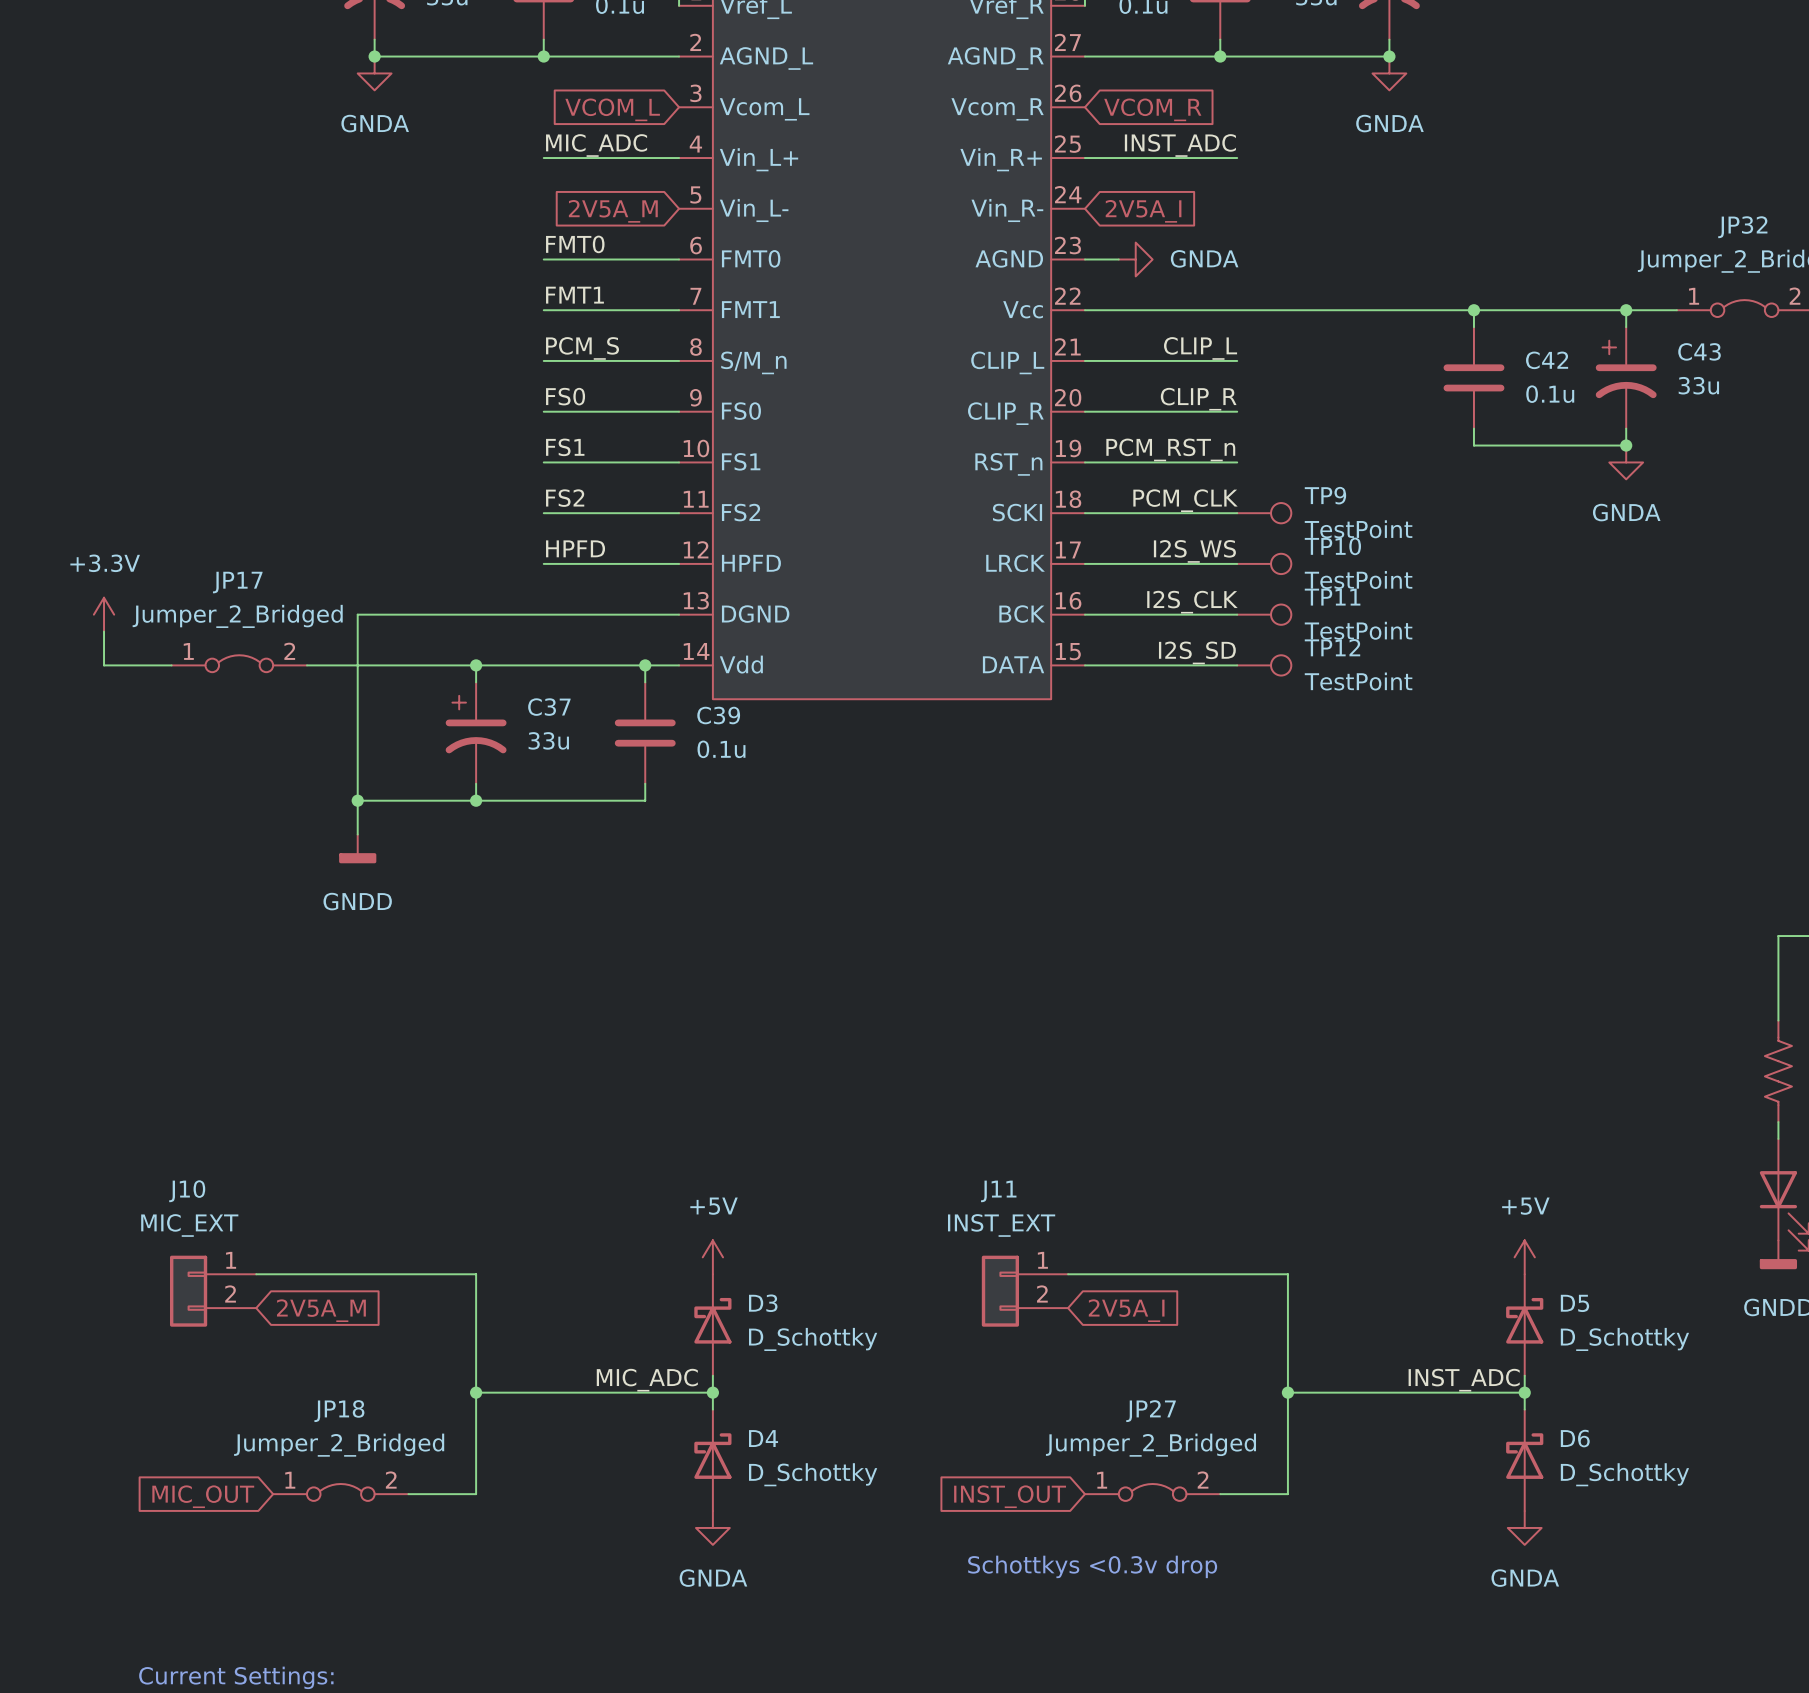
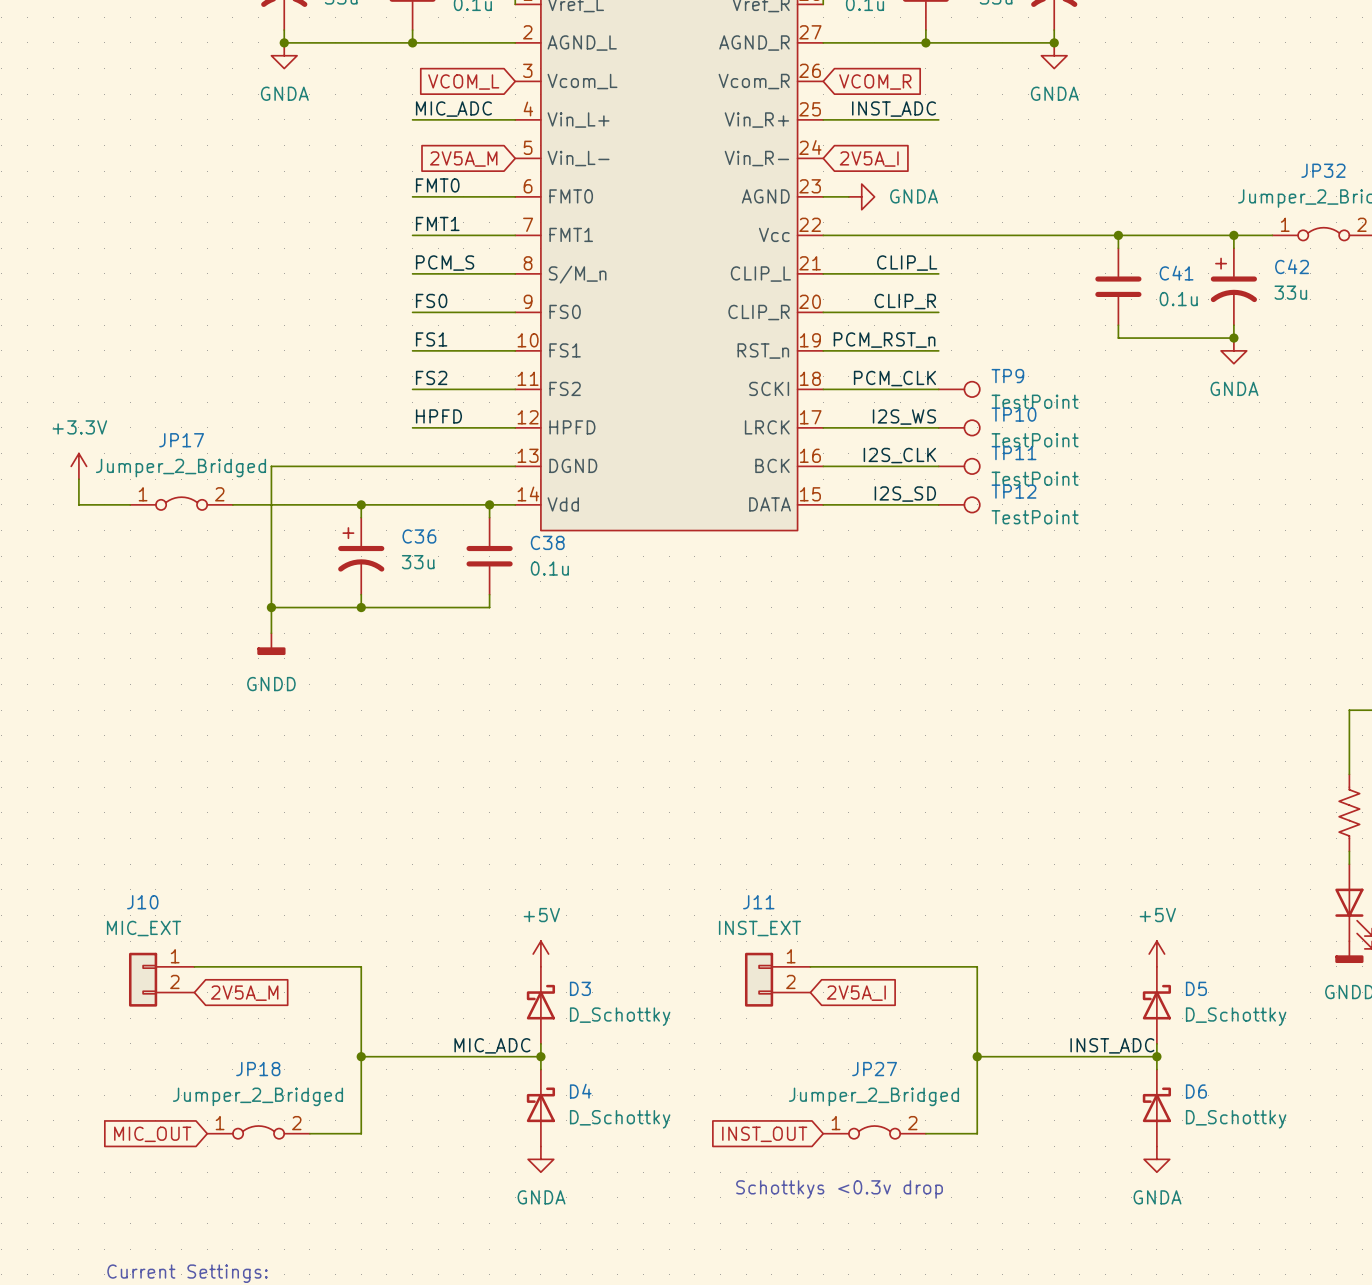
C43 name: C43 (1699, 351) -> C42 (1292, 266)
C42 name: C42 (1547, 360) -> C41 (1176, 273)
C37 name: C37 (549, 707) -> C36 (419, 536)
C39 name: C39 (718, 715) -> C38 (547, 542)

